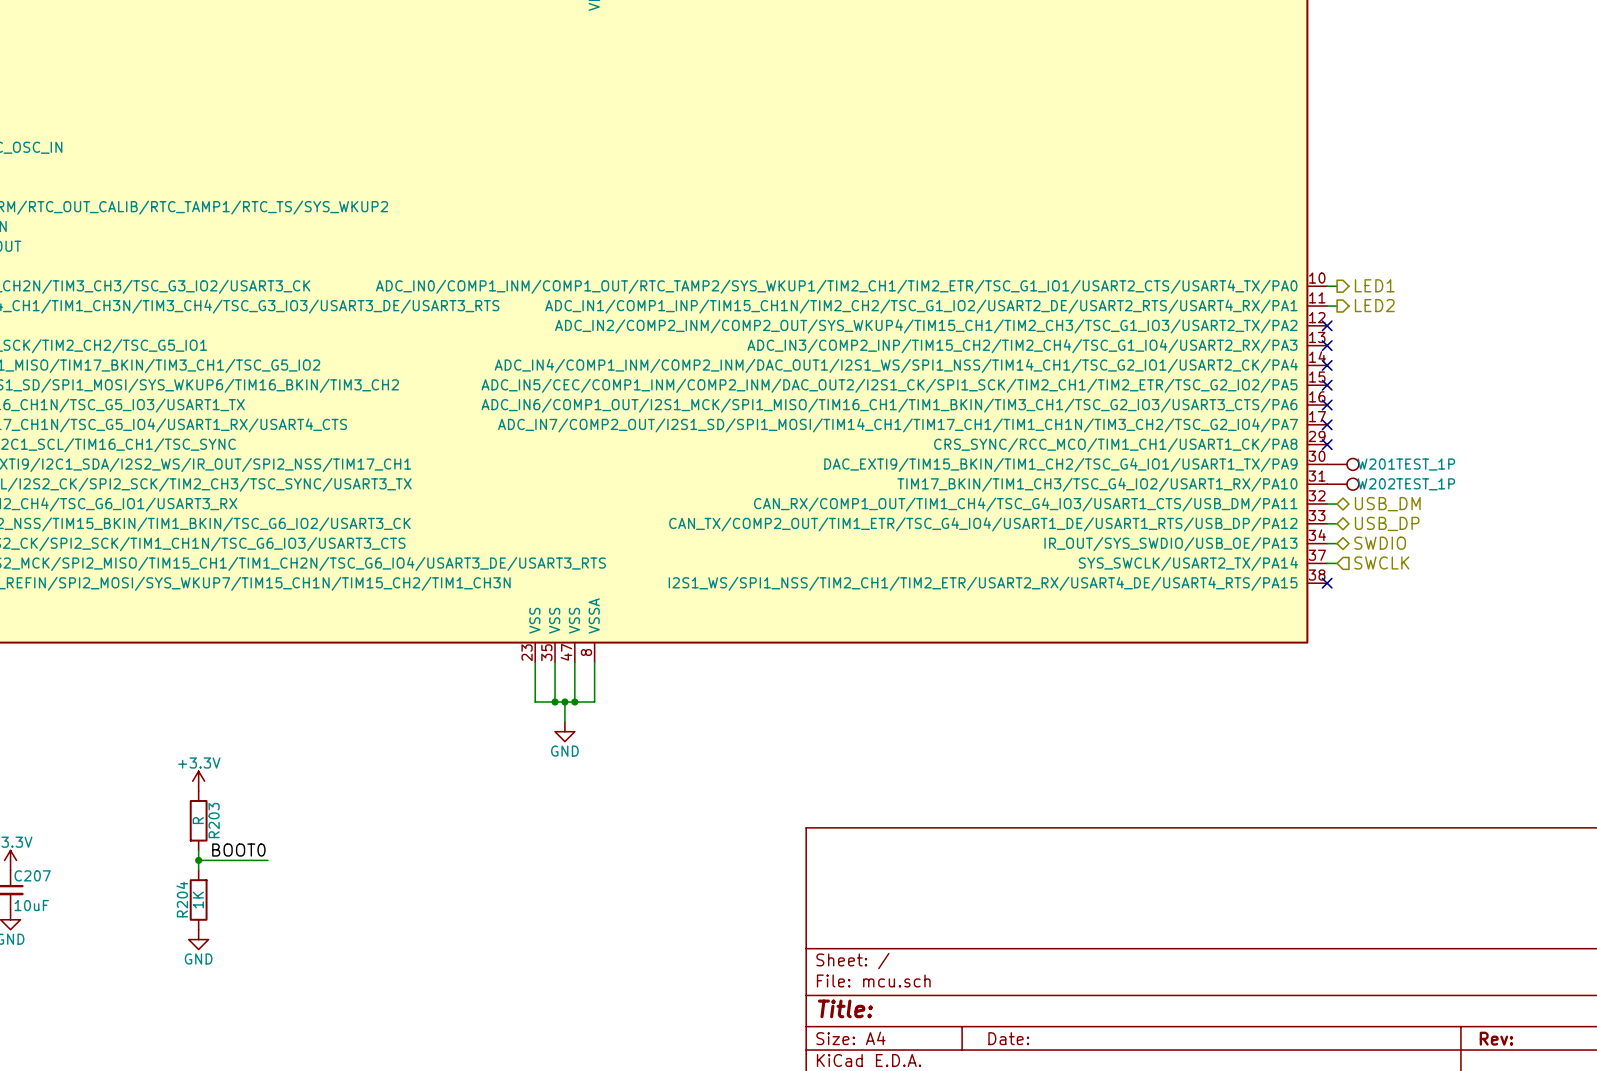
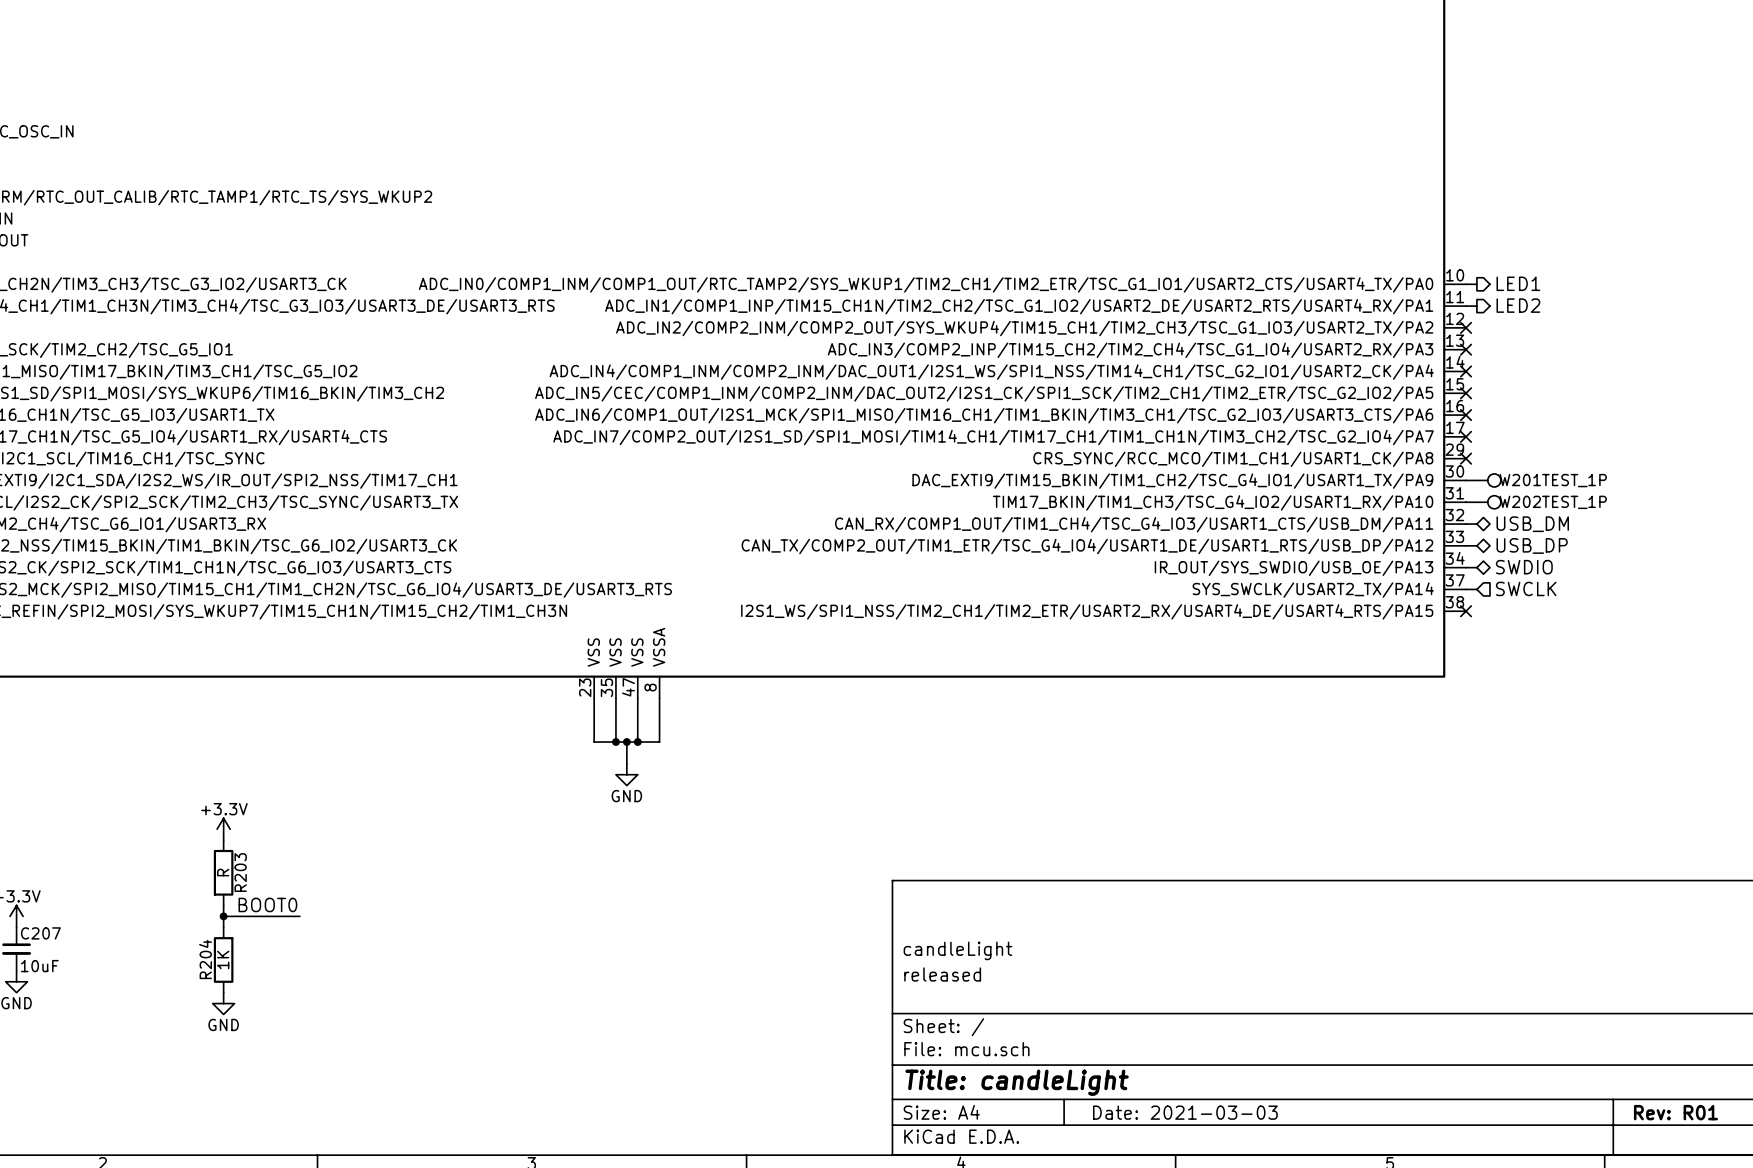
title block: none -> candleLight (957, 950)
title block: none -> released (942, 974)
title block: Title: (845, 1008) -> Title: candleLight (1017, 1082)
title block: Date: (1008, 1038) -> Date: 2021-03-03 (1185, 1112)
title block: Rev: (1496, 1038) -> Rev: R01 (1675, 1112)

